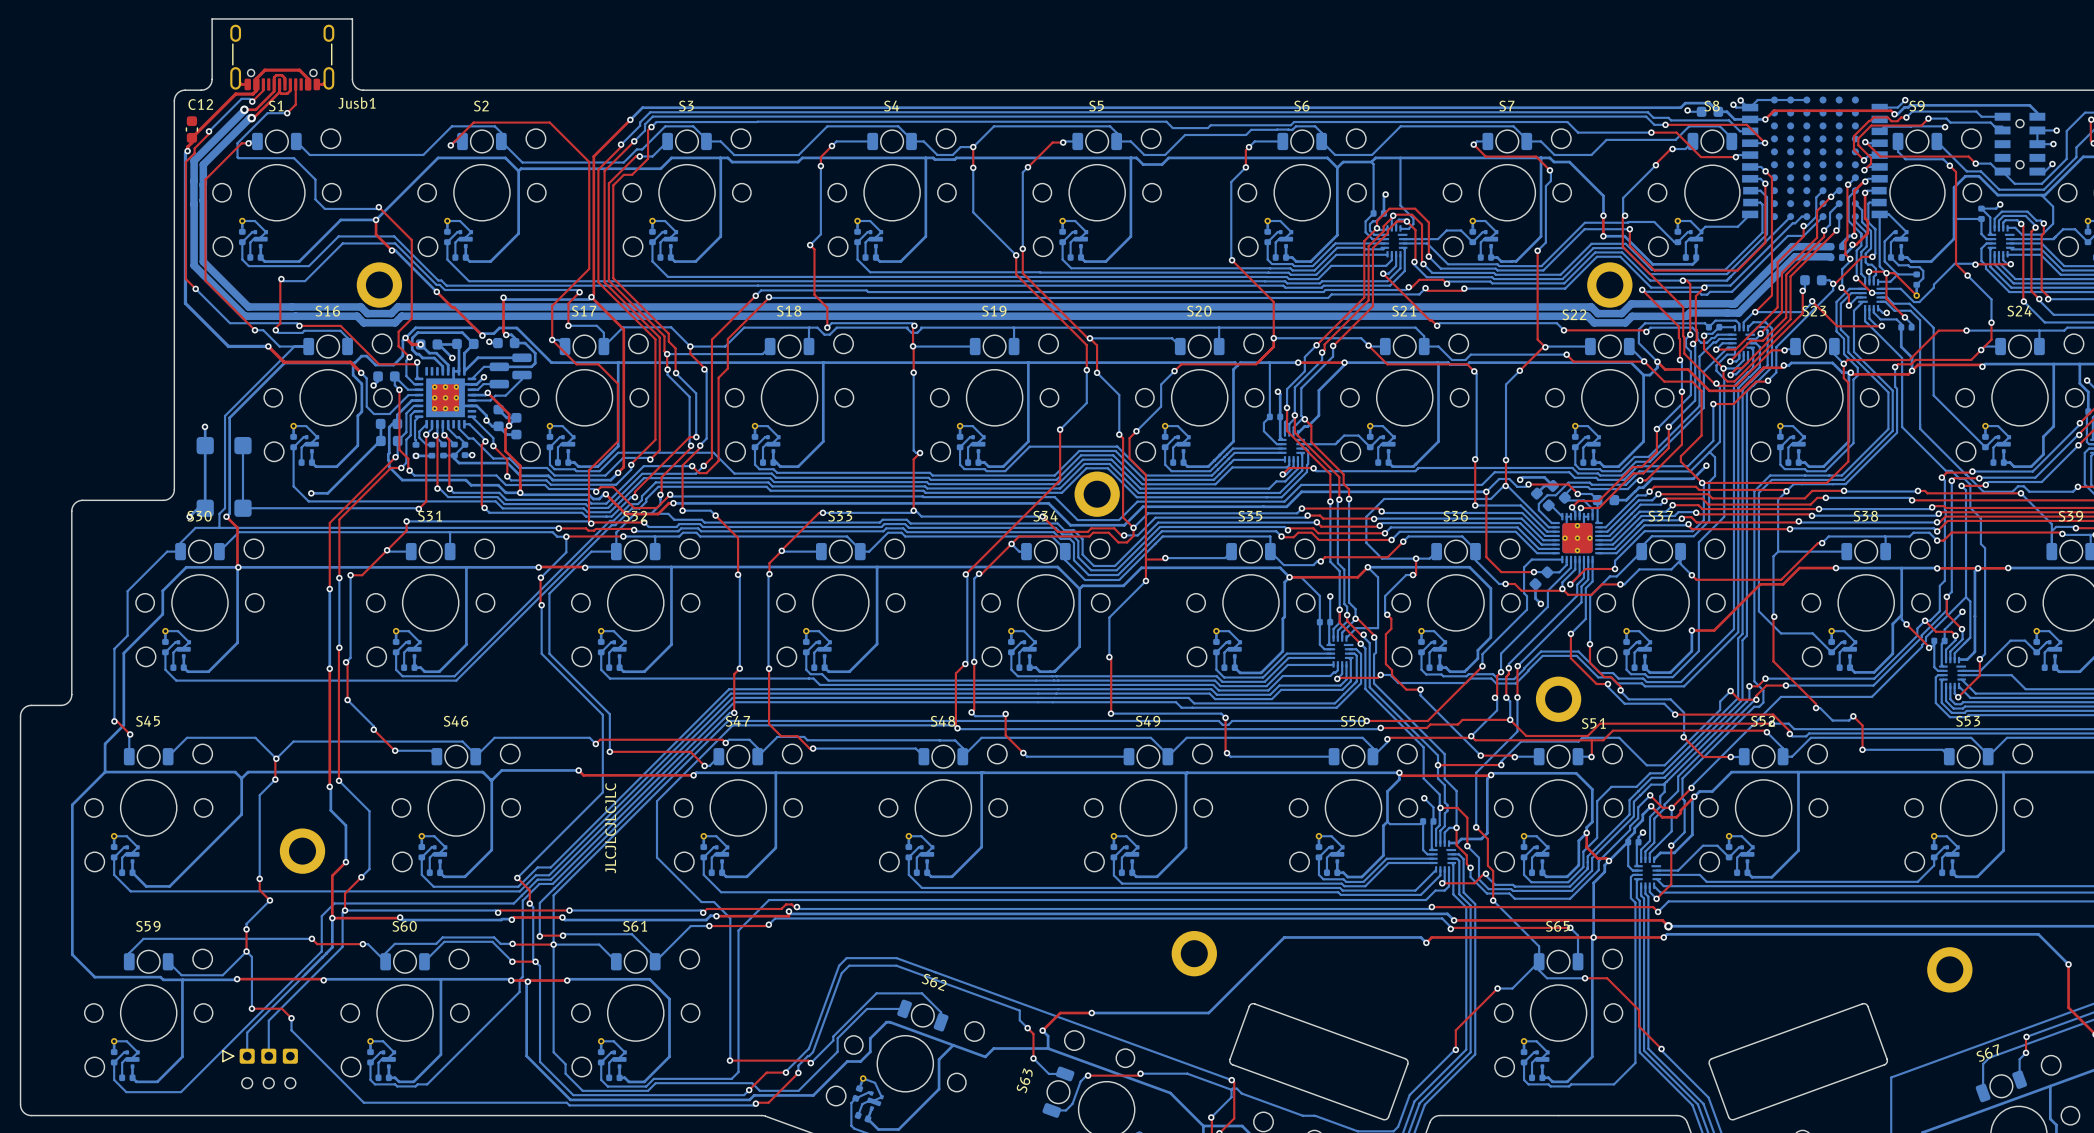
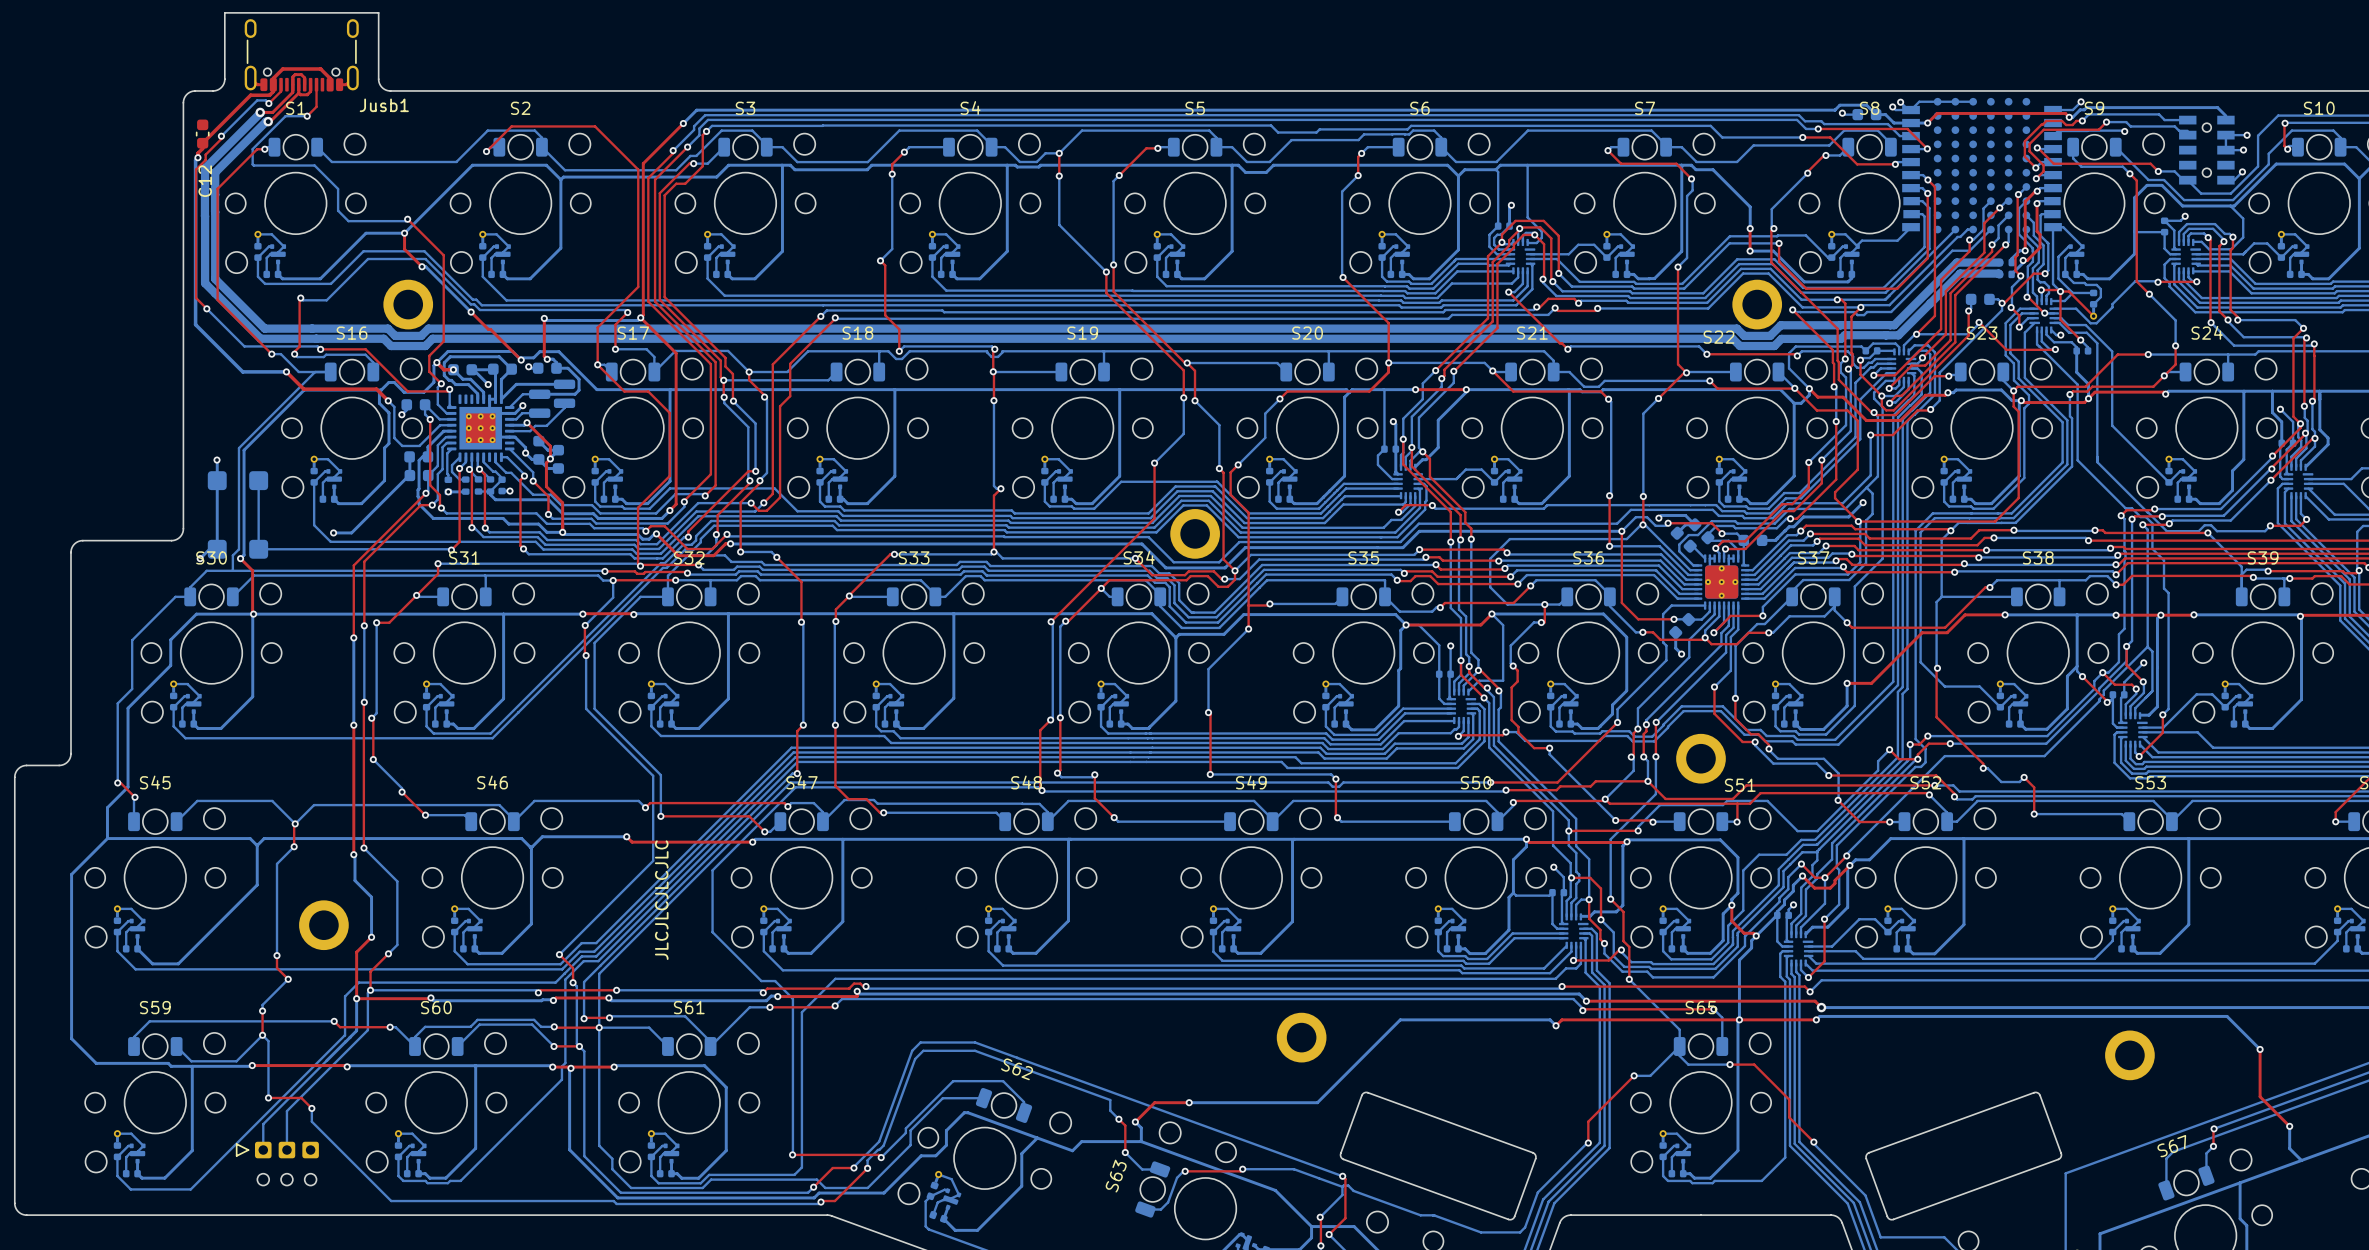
C12 name rotation: 0° (200, 104) -> 90° counterclockwise (205, 181)
C12 name position: C12 (200, 104) -> C12 (205, 181)

